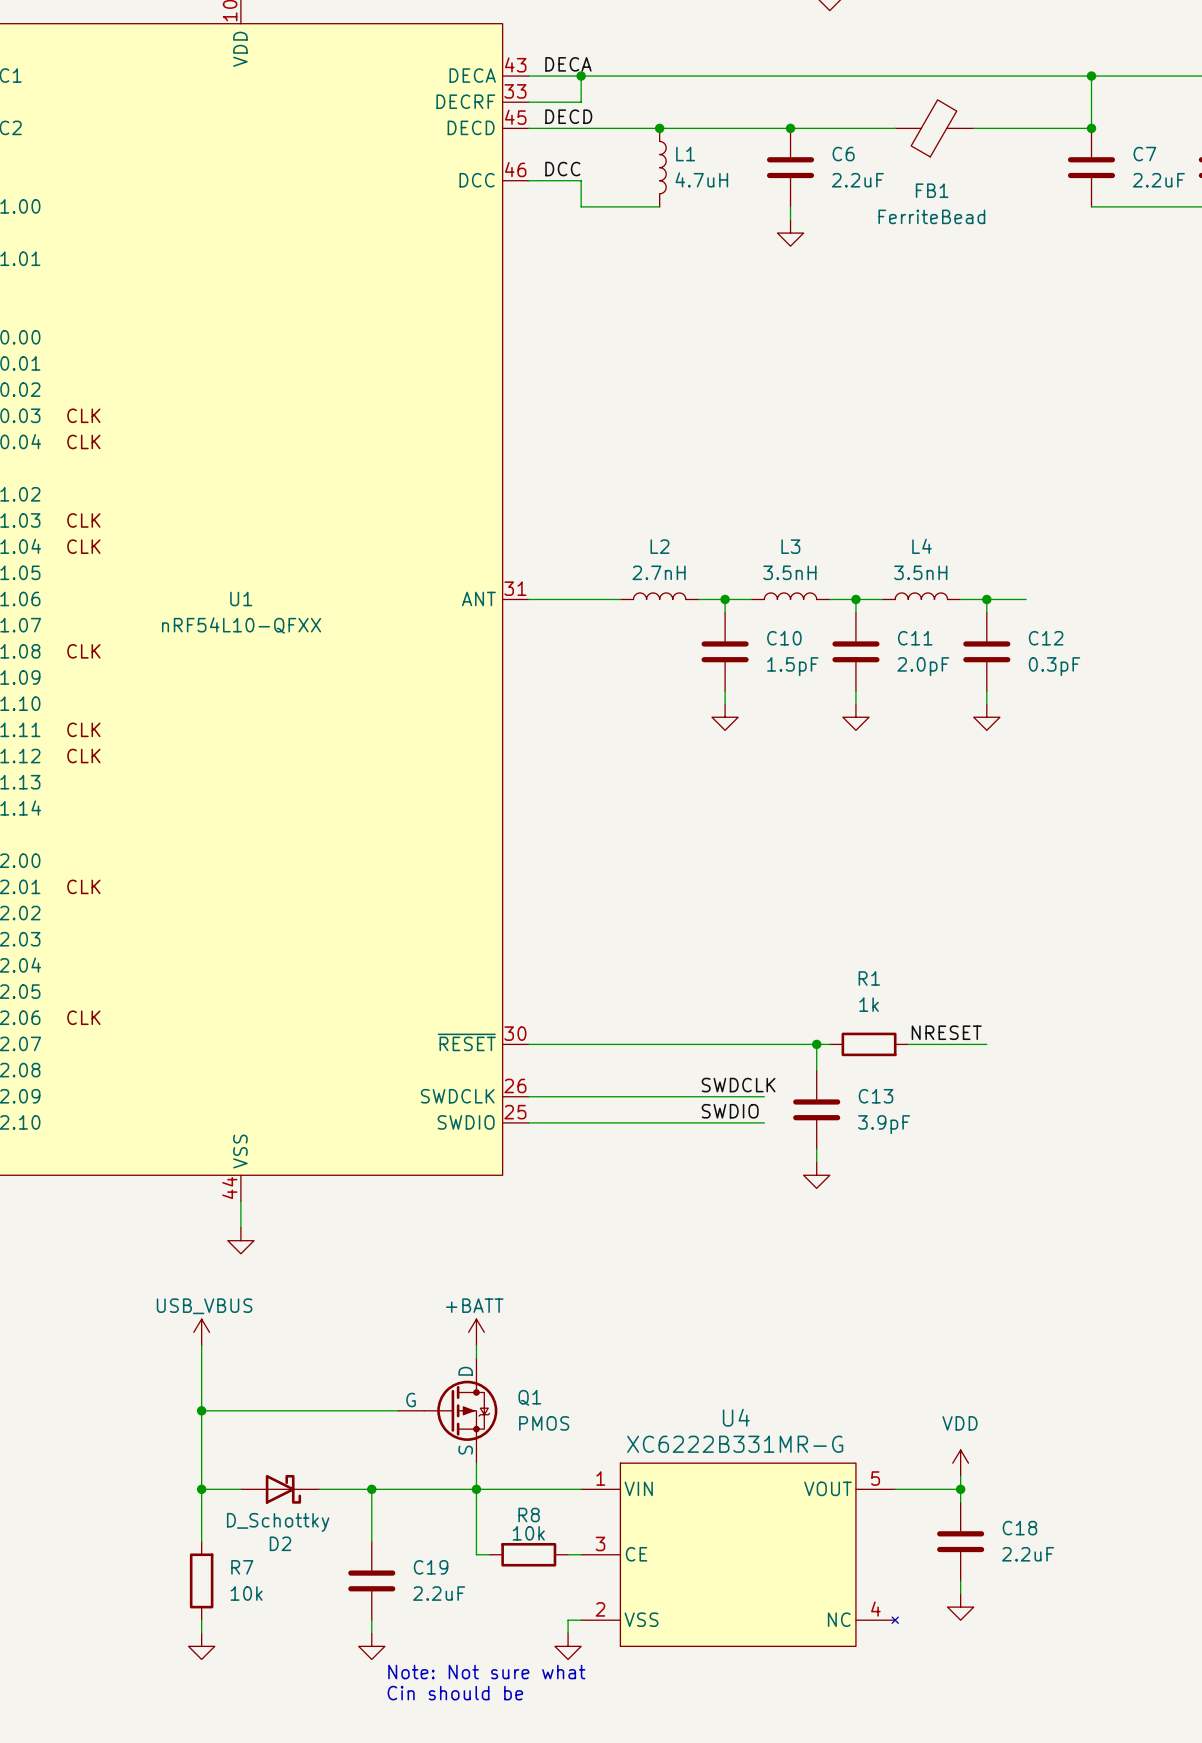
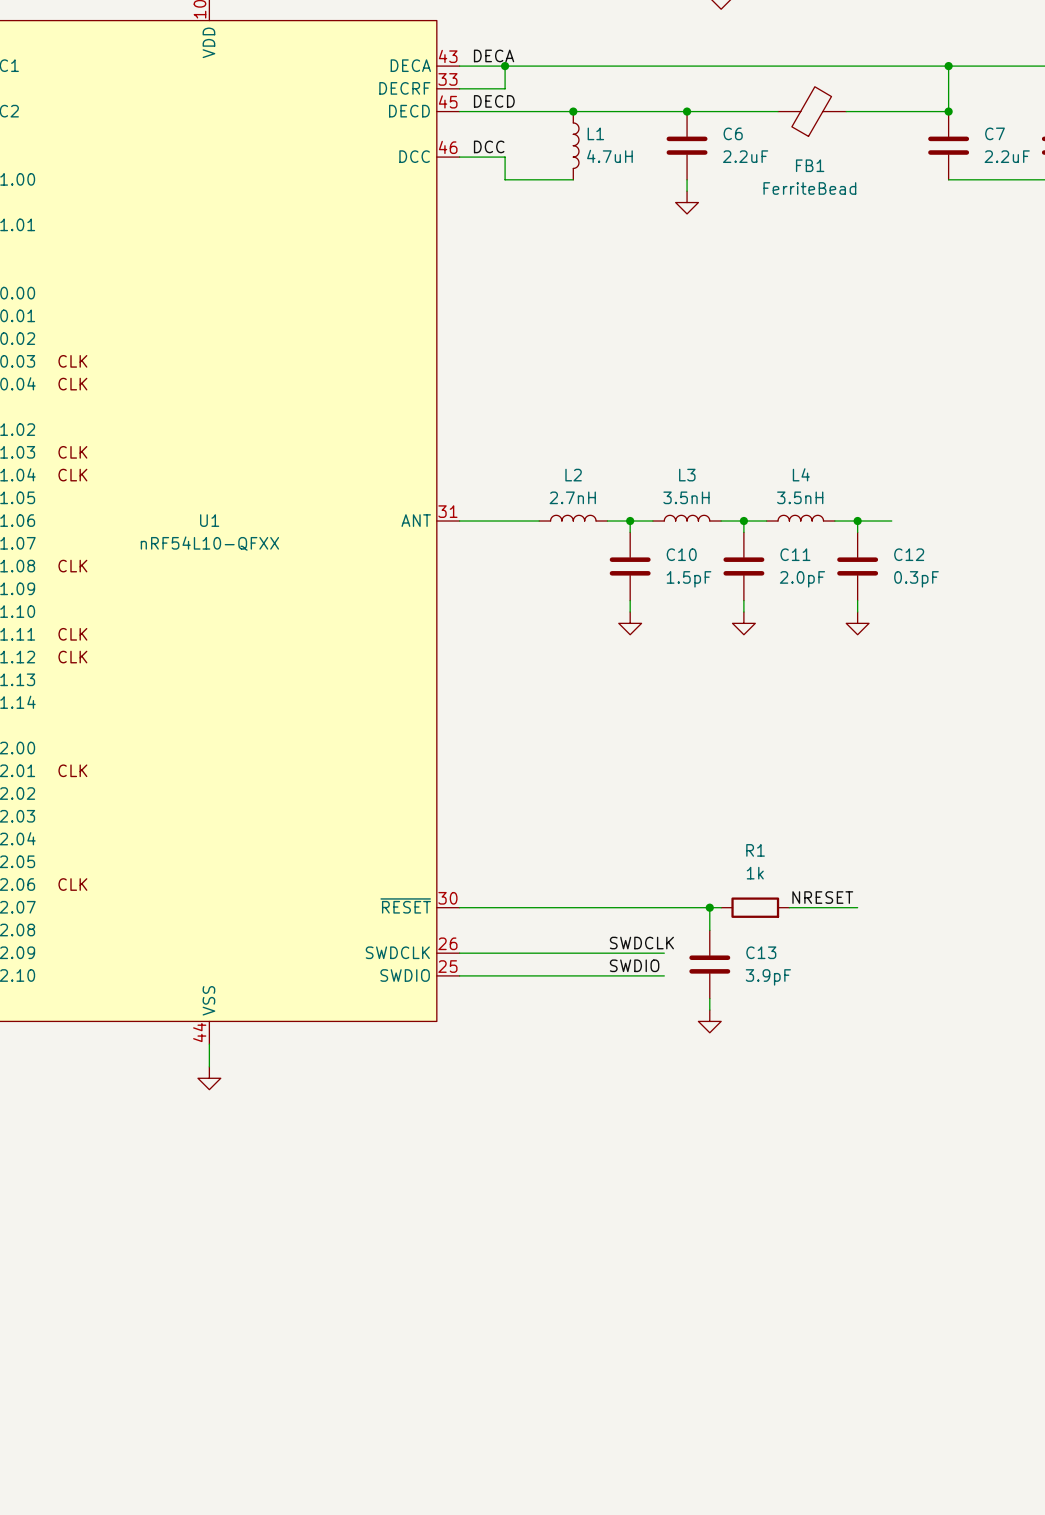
power symbol: USB_VBUS (201, 1332) -> none
power symbol: +BATT (476, 1332) -> none
wire: (201, 1345) (201, 1541) -> none
wire: (476, 1345) (476, 1358) -> none
wire: (201, 1410) (397, 1410) -> none
junction: (201, 1410) -> none
Q1: PMOS (447, 1410) -> none
wire: (476, 1463) (476, 1554) (489, 1554) -> none
power symbol: VDD (960, 1463) -> none
wire: (960, 1476) (960, 1502) -> none
wire: (201, 1489) (240, 1489) -> none
junction: (201, 1489) -> none
D2: D_Schottky (280, 1489) -> none
wire: (319, 1489) (581, 1489) -> none
wire: (371, 1489) (371, 1541) -> none
junction: (371, 1489) -> none
junction: (476, 1489) -> none
wire: (895, 1489) (960, 1489) -> none
junction: (960, 1489) -> none
C18: 2.2uF (960, 1541) -> none
R8: 10k (528, 1554) -> none
wire: (568, 1554) (581, 1554) -> none
U4: XC6222B331MR-G (739, 1554) -> none
R7: 10k (201, 1580) -> none
C19: 2.2uF (371, 1580) -> none
wire: (960, 1580) (960, 1594) -> none
power symbol: (960, 1607) -> none
wire: (201, 1620) (201, 1633) -> none
wire: (371, 1620) (371, 1633) -> none
wire: (581, 1620) (568, 1620) (568, 1633) -> none
power symbol: (201, 1646) -> none
power symbol: (371, 1646) -> none
power symbol: (568, 1646) -> none
text: Note: Not sure what (486, 1672) -> none
text: Cin should be (455, 1693) -> none

